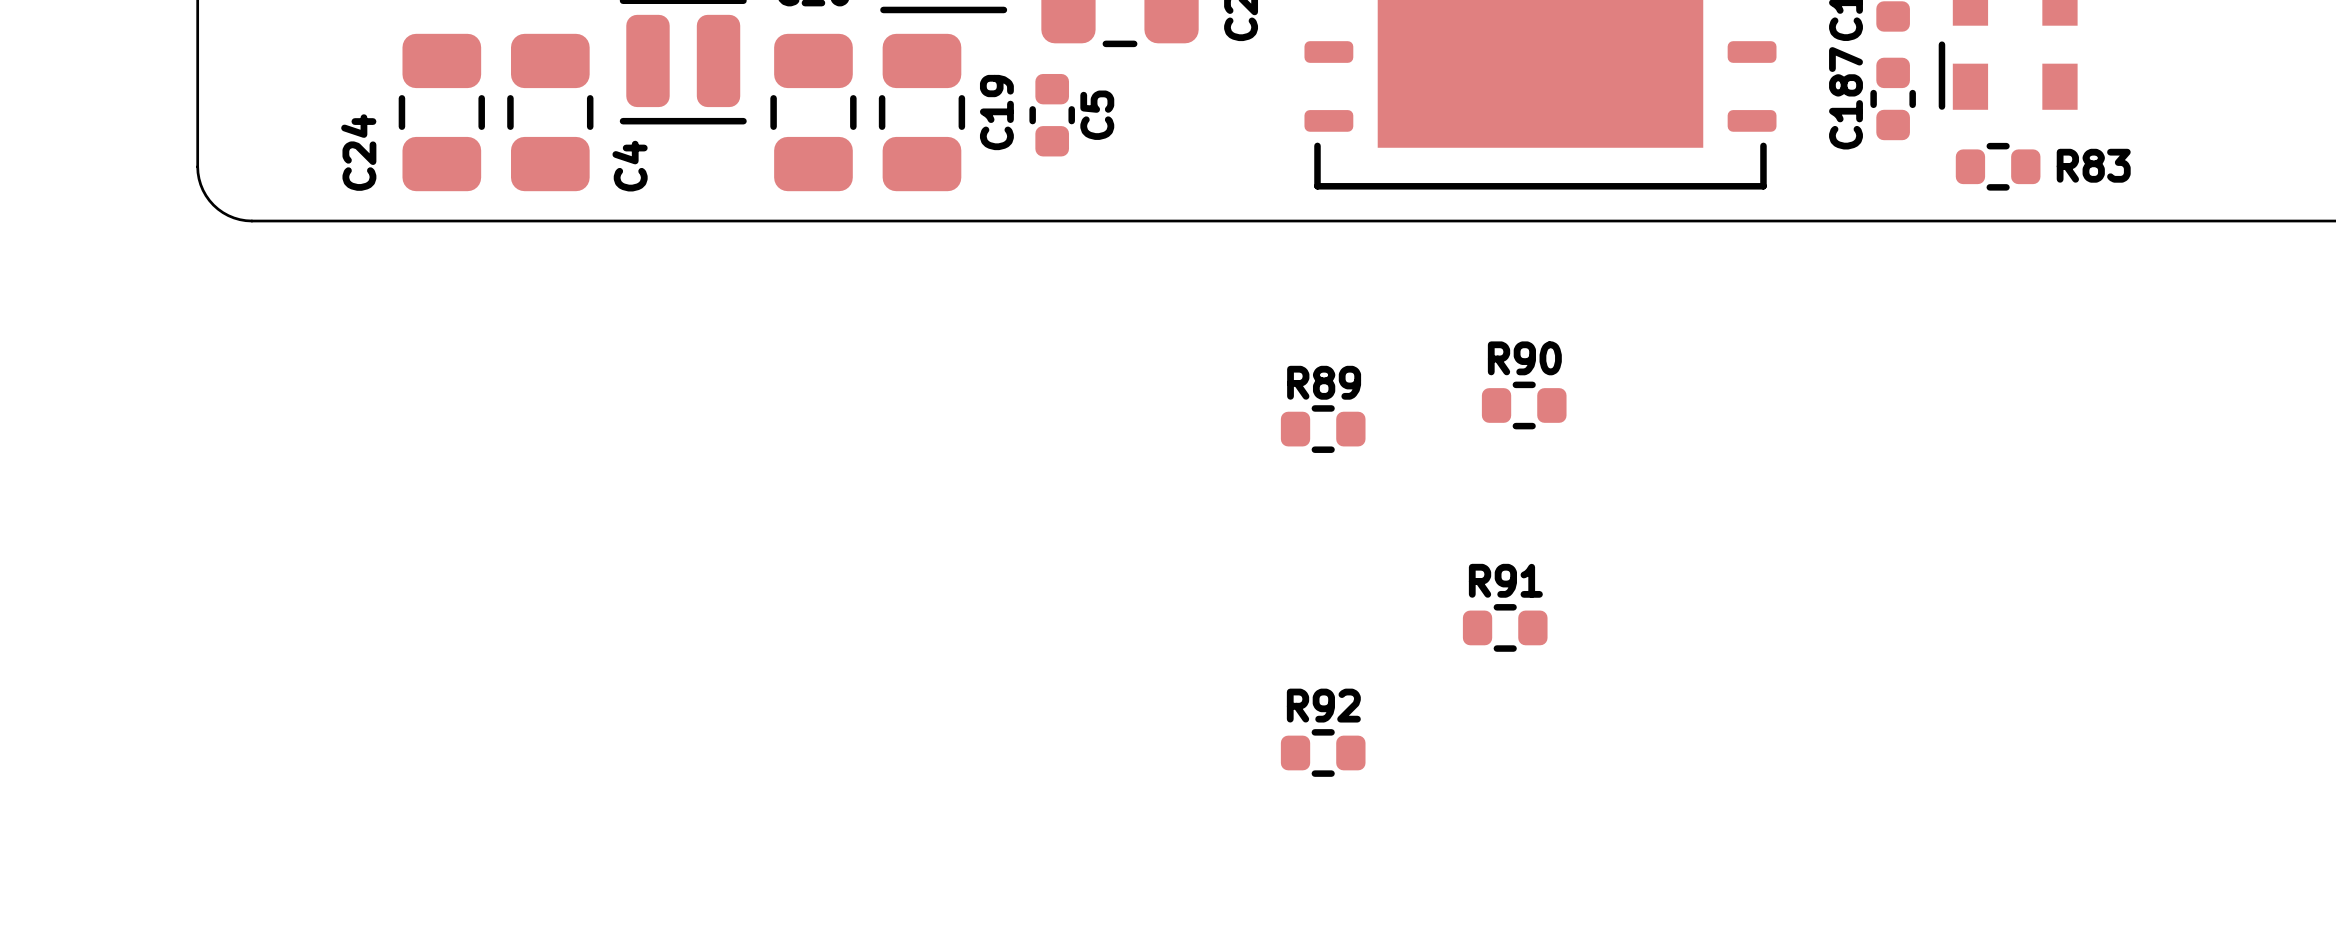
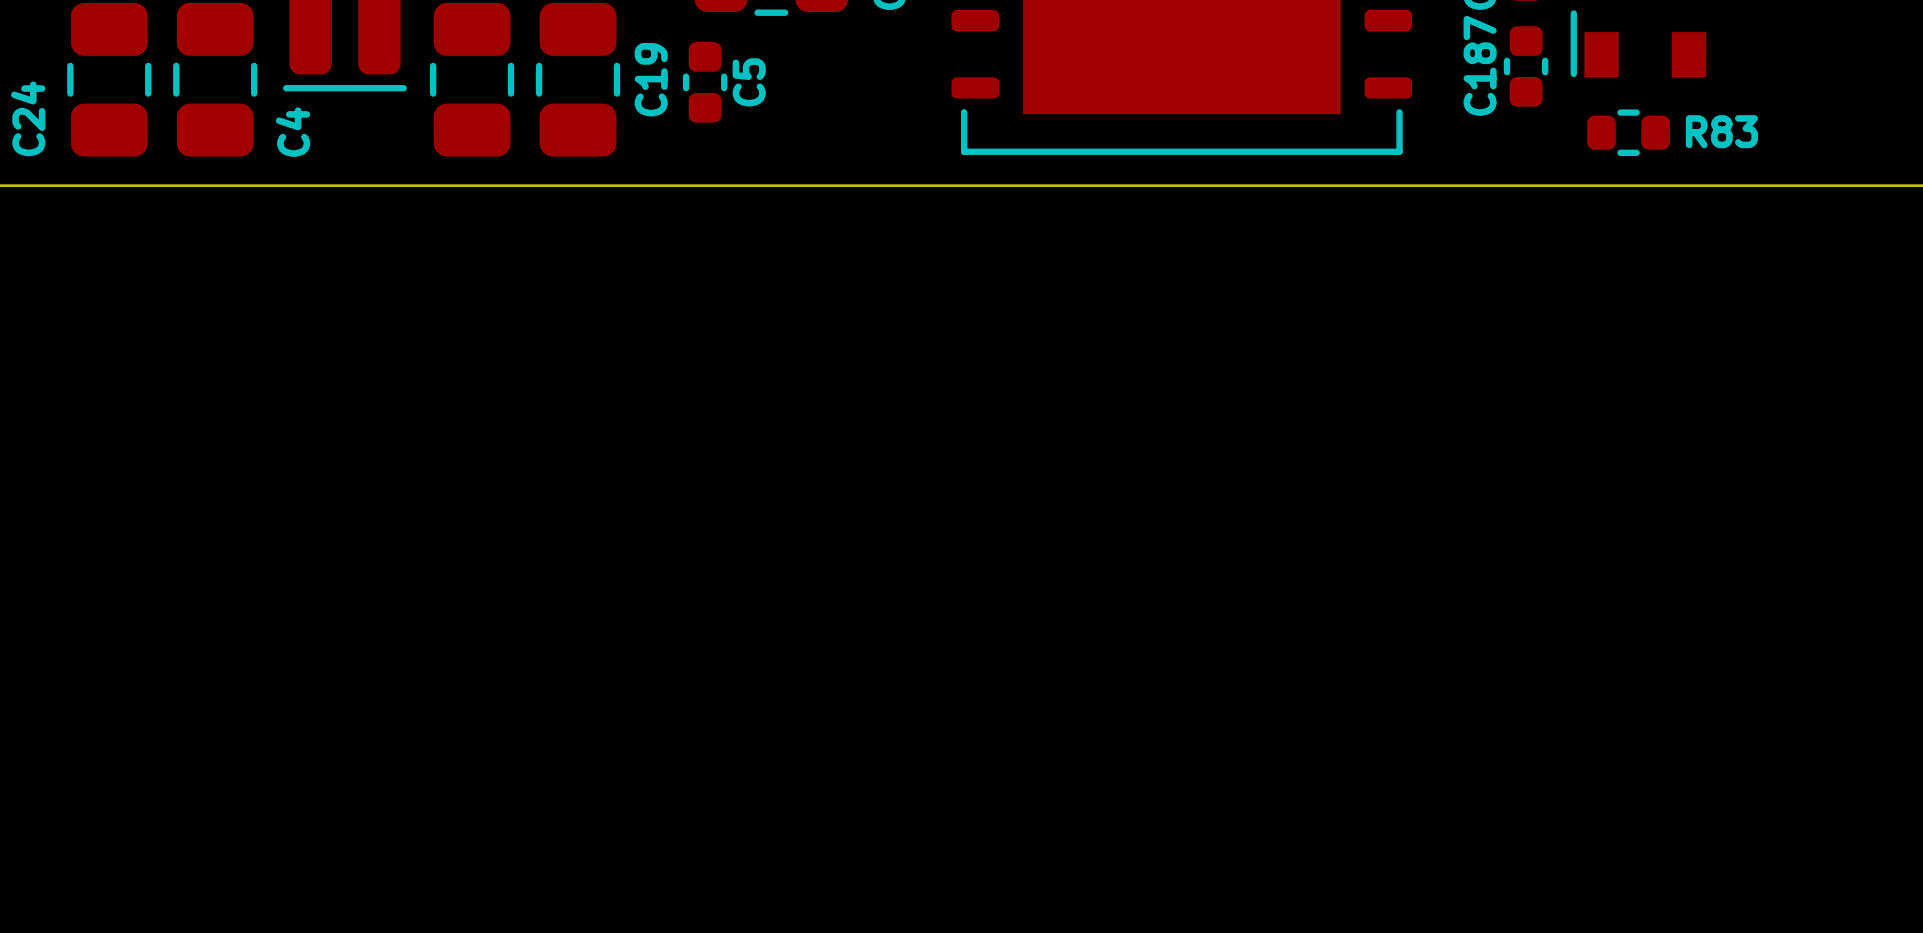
R90: (1524, 405) -> none
R89: (1323, 429) -> none
R91: (1505, 627) -> none
R92: (1323, 752) -> none

